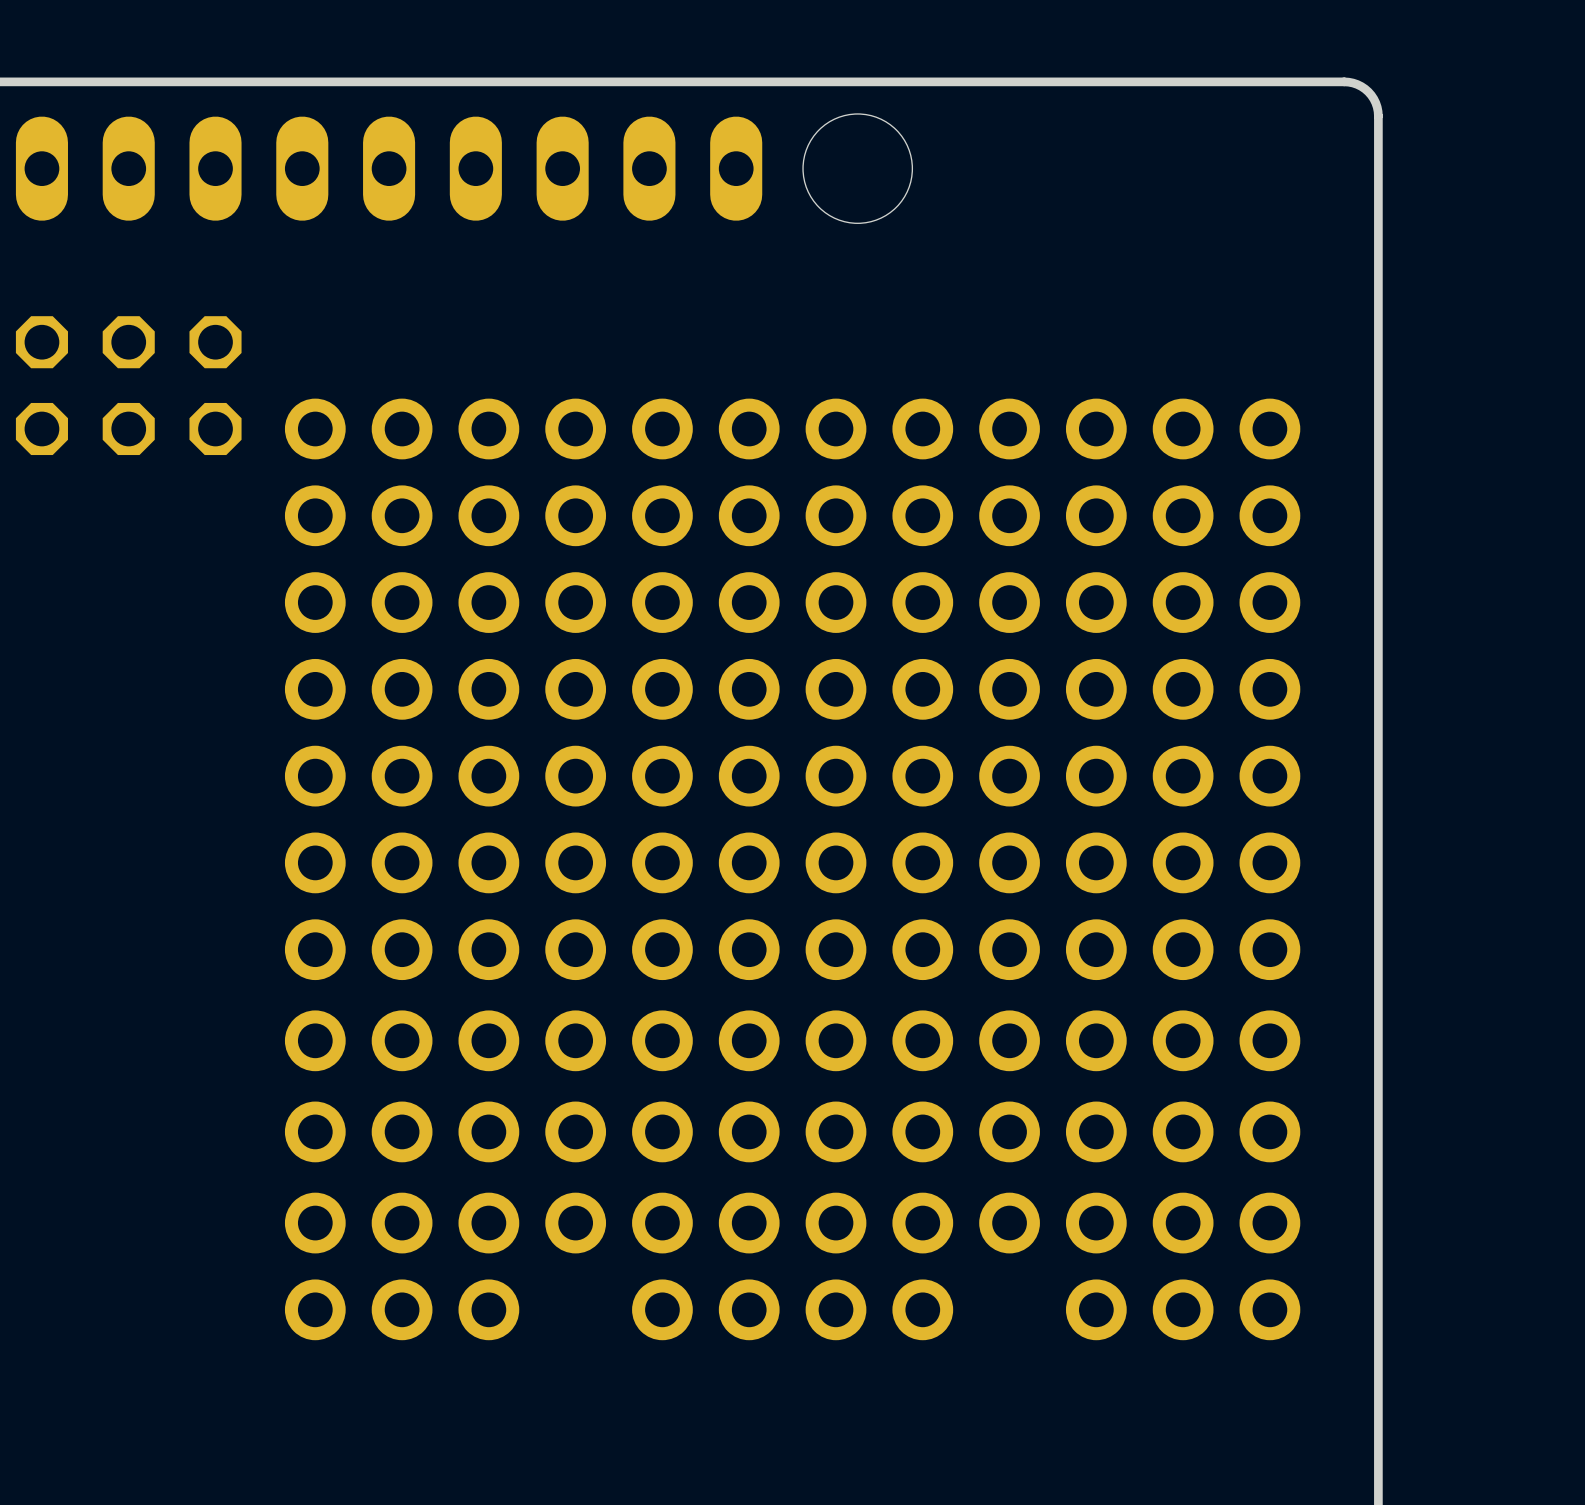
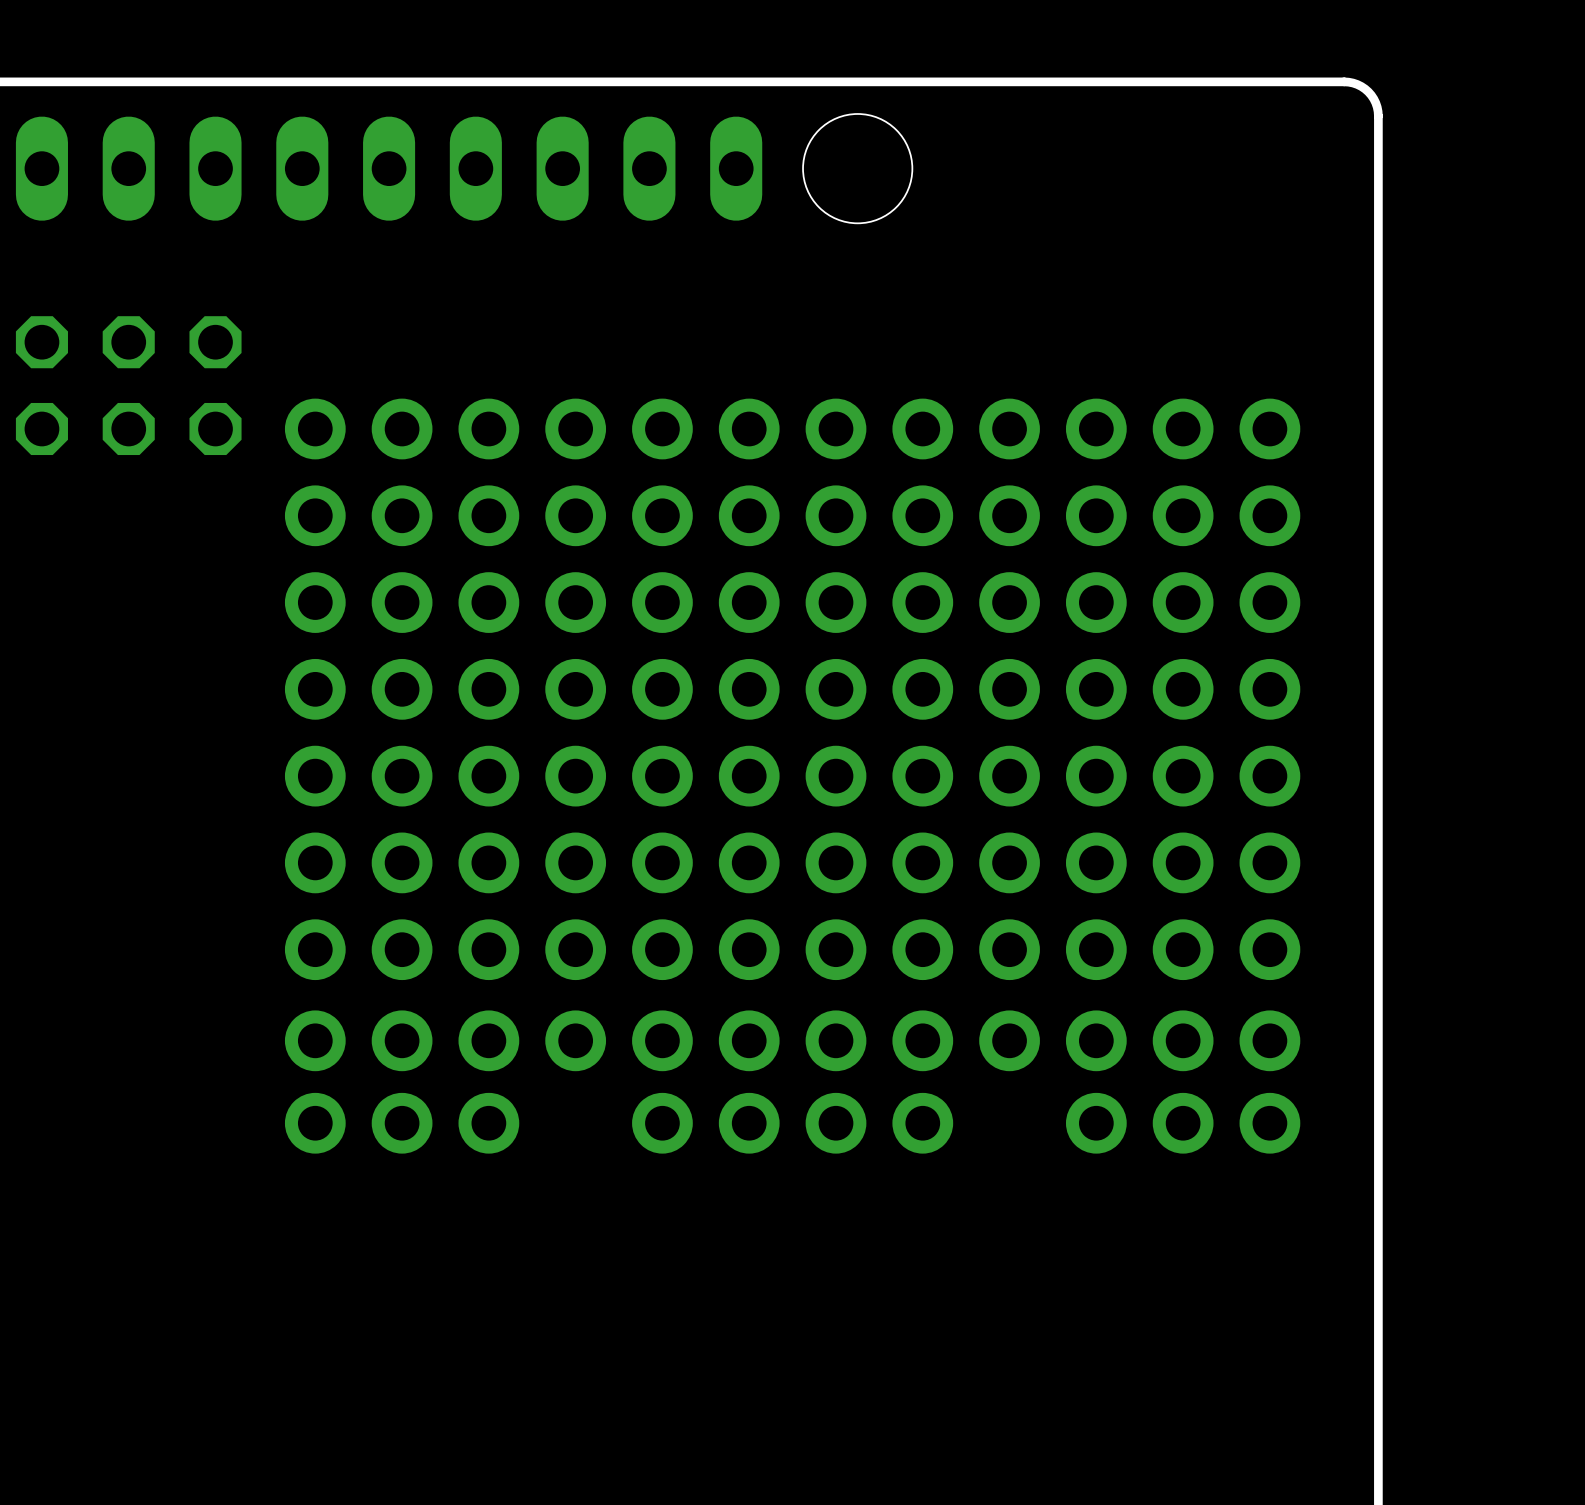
part footprint: [284, 1101, 1301, 1163] -> [632, 1092, 954, 1154]
part: (792, 1223) -> none
part position: (402, 1309) -> (402, 1123)
part: (792, 1309) -> none
part position: (1183, 1309) -> (1183, 1123)

